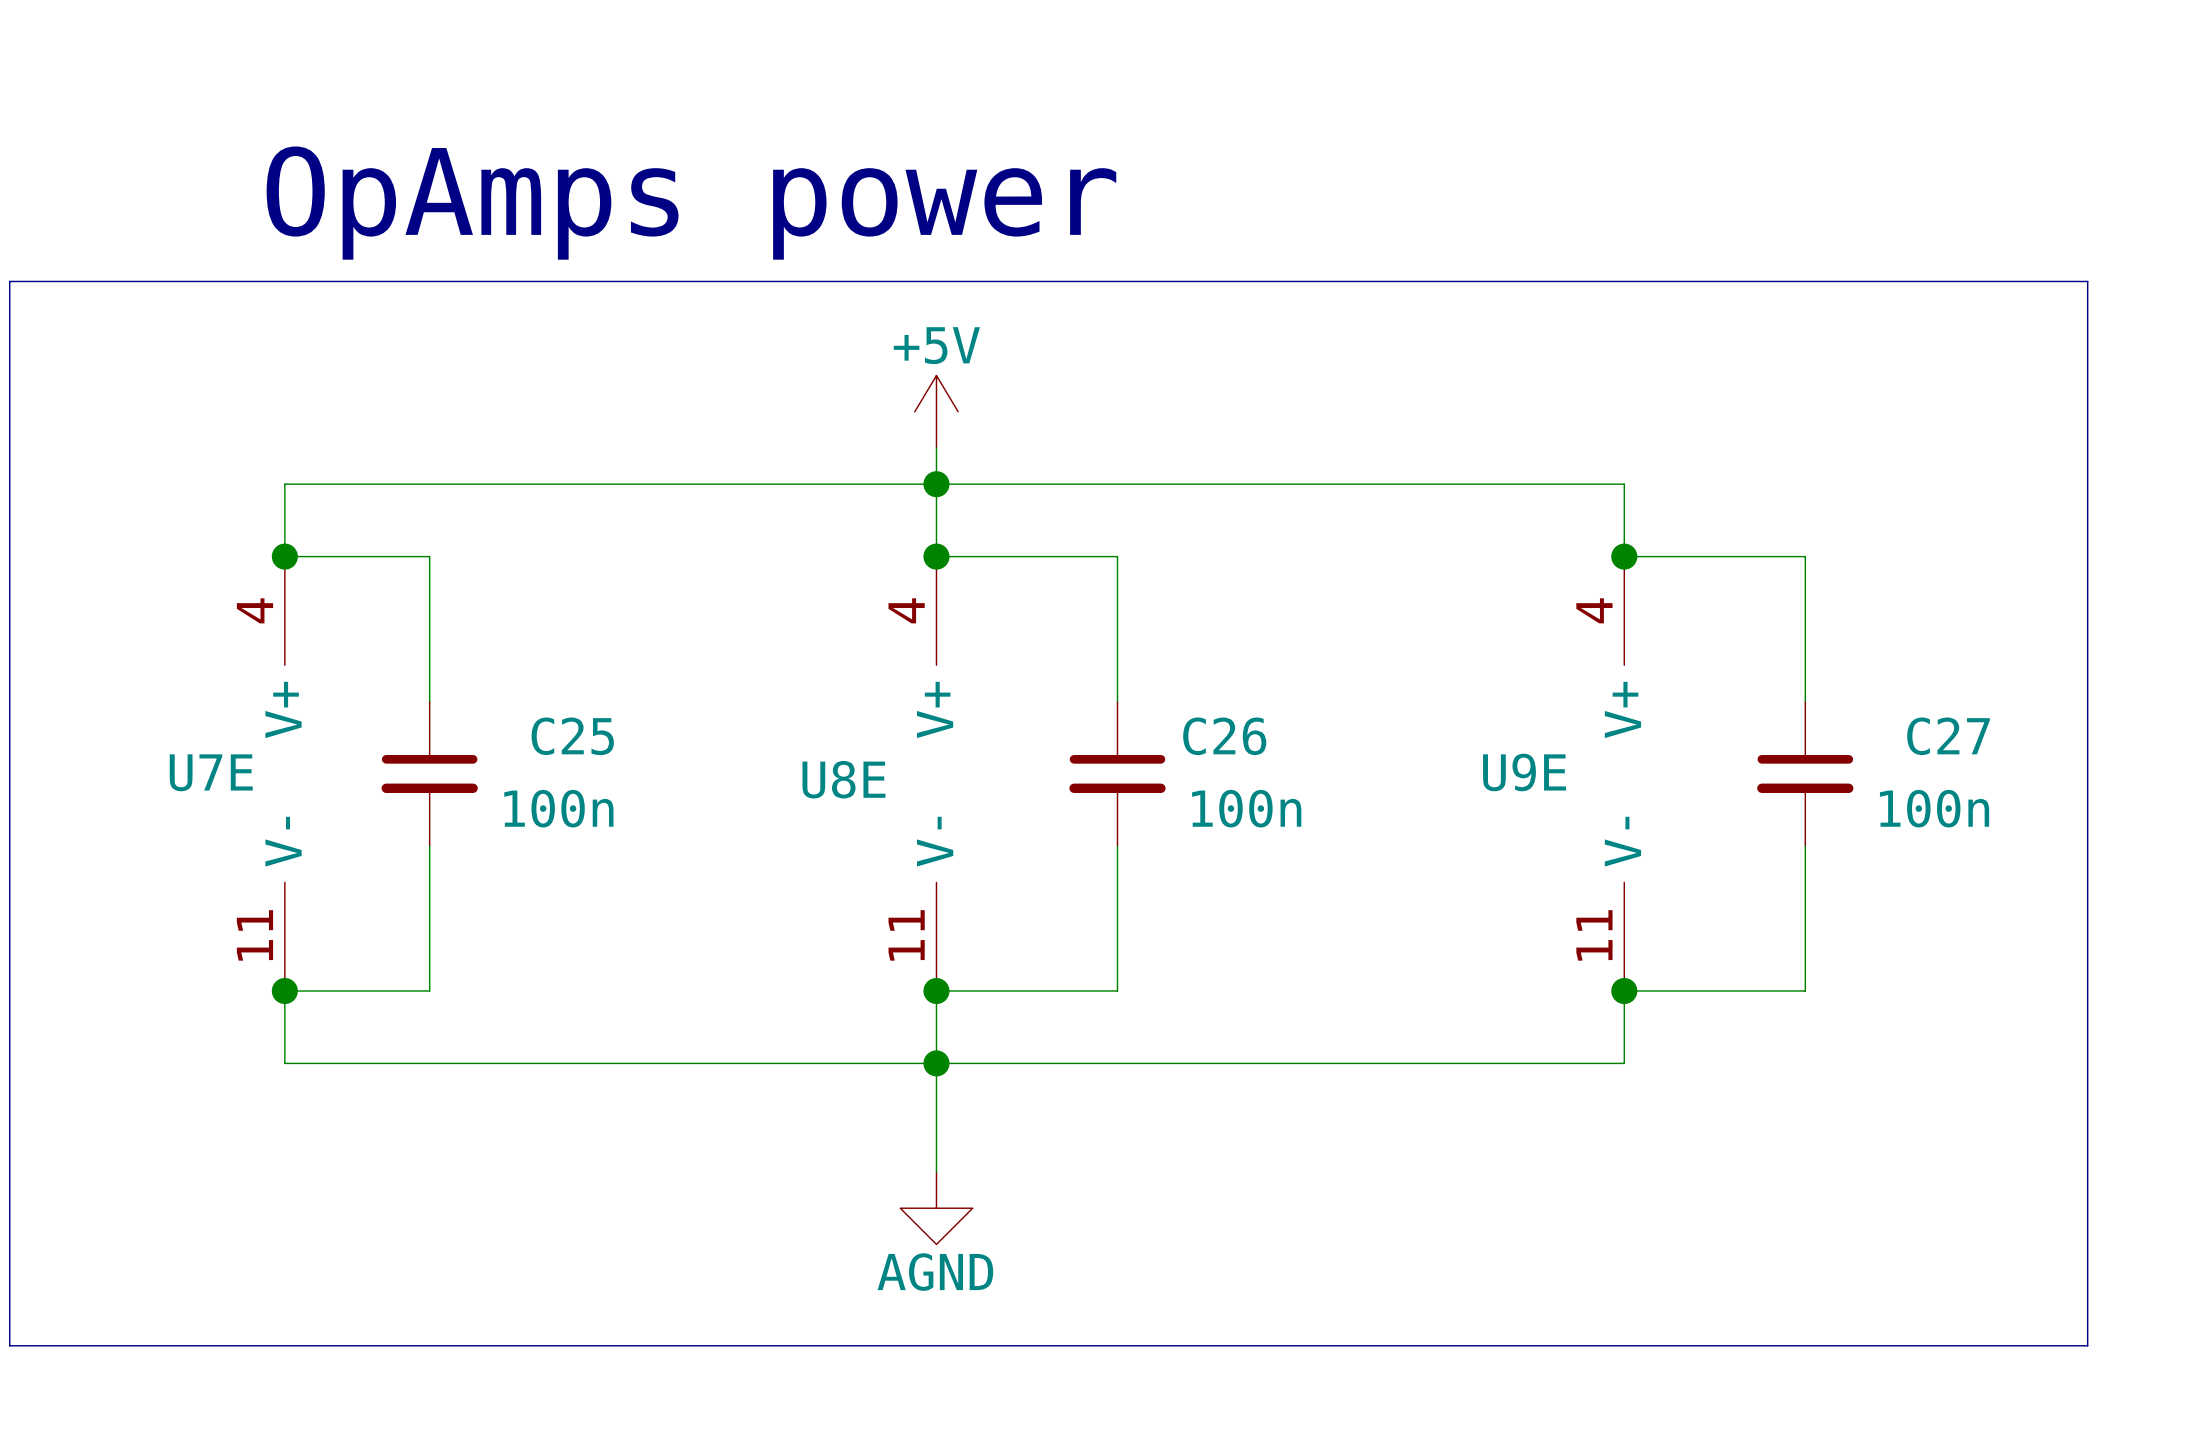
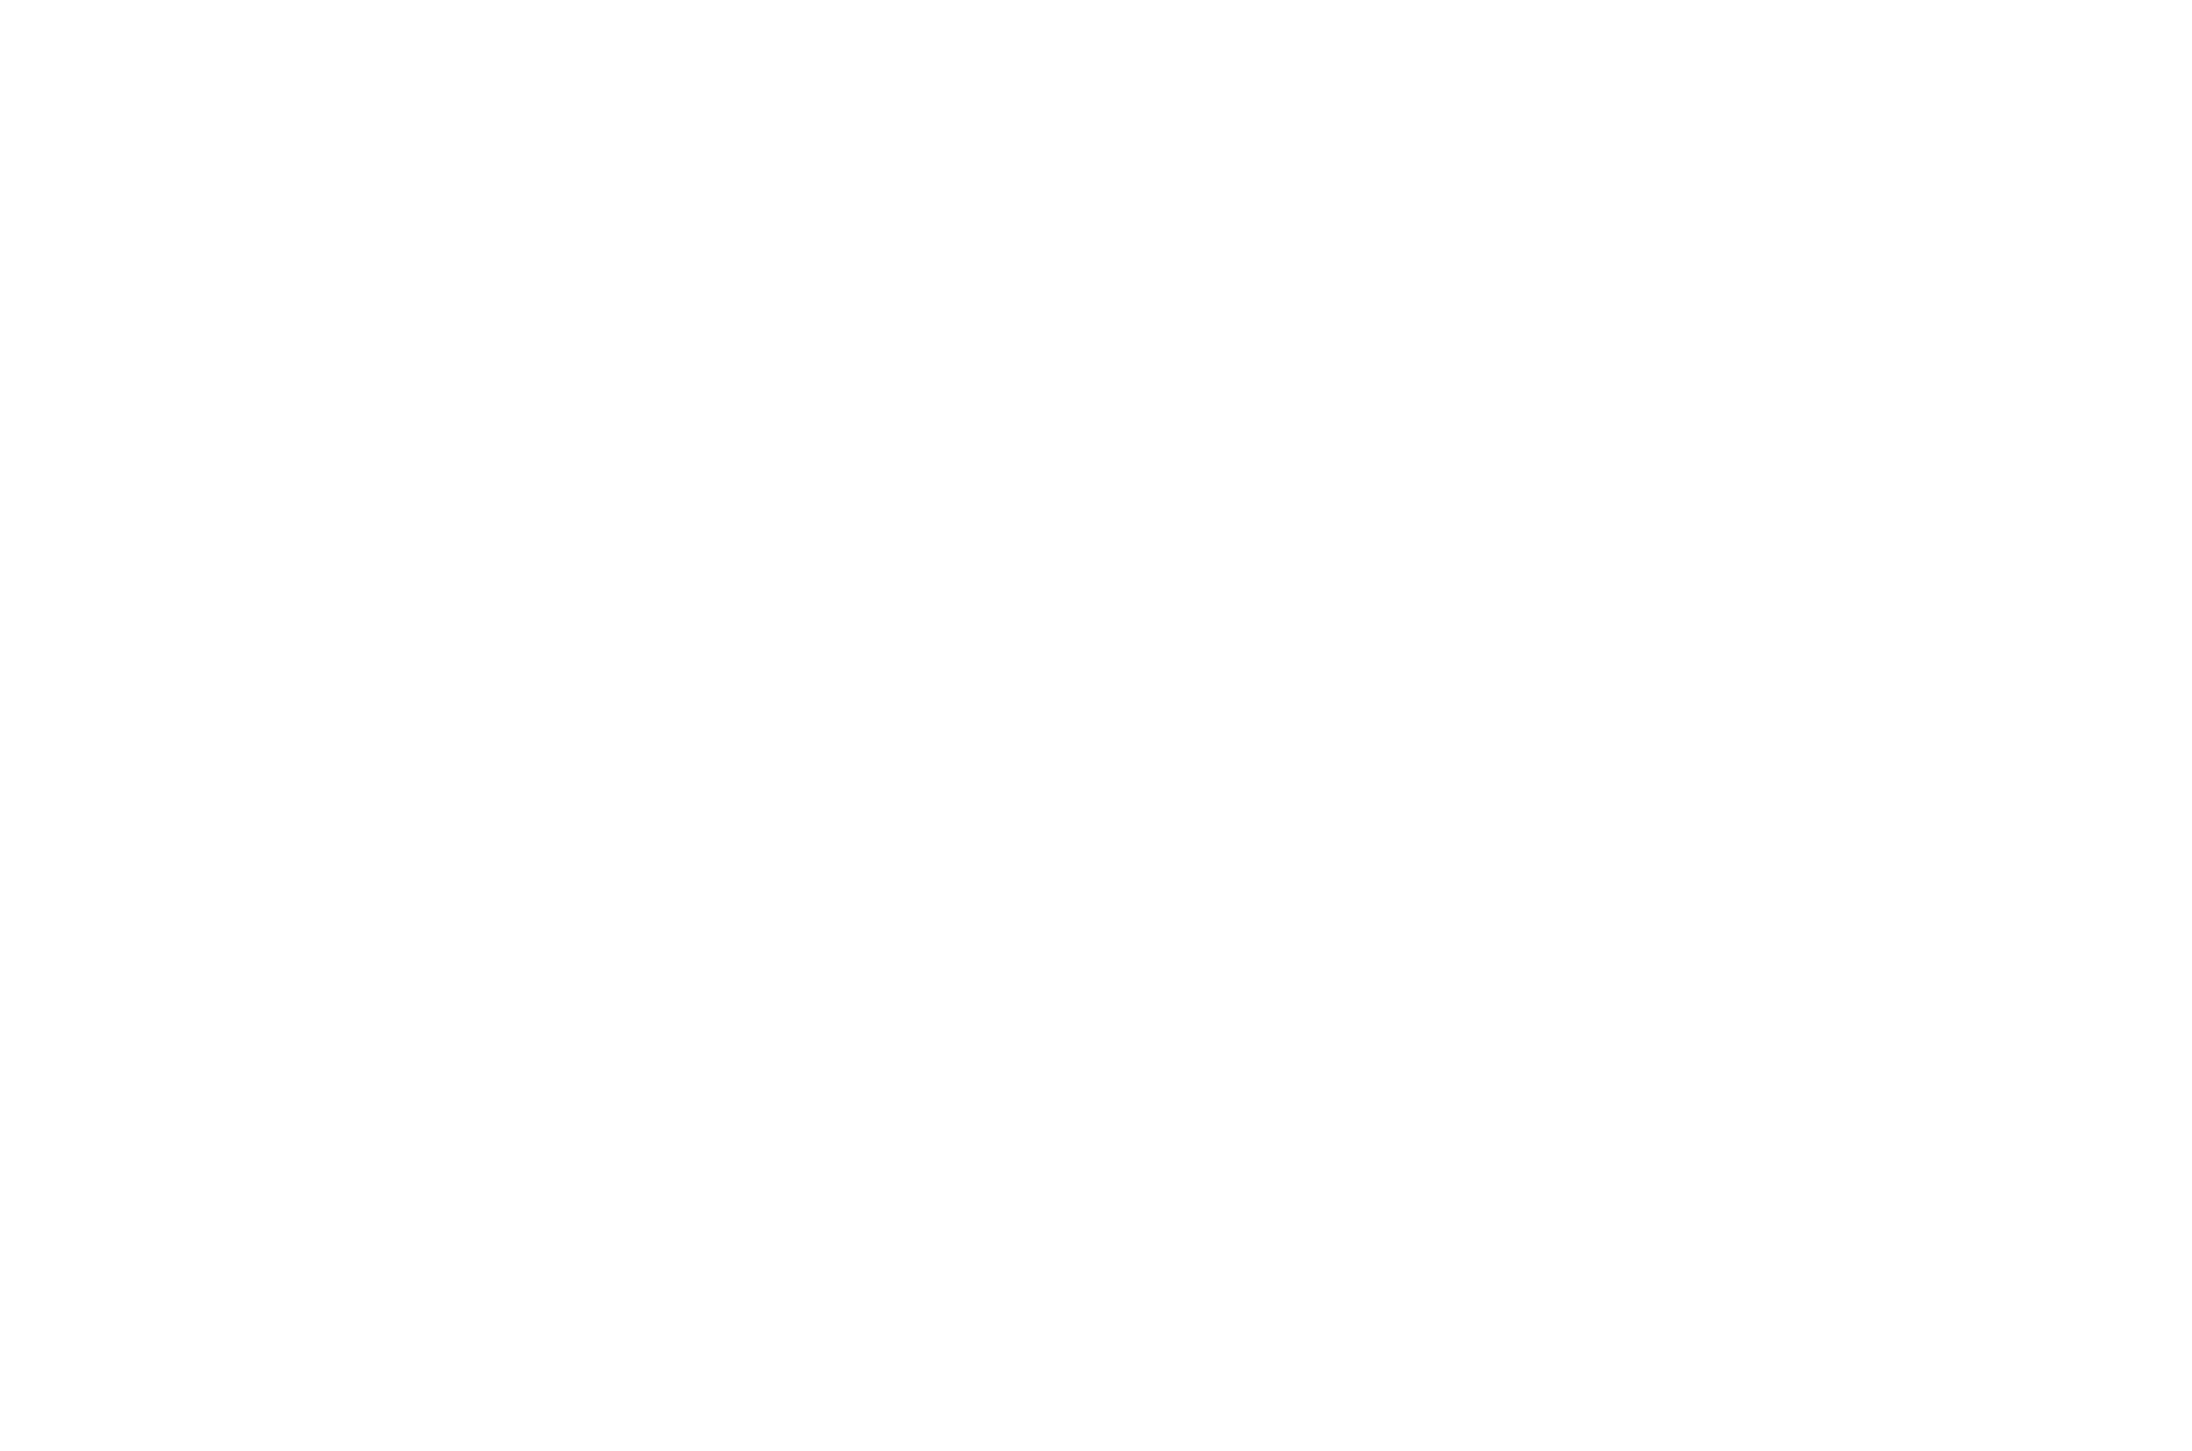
text: OpAmps power (691, 203) -> none
line: (9, 281) (2087, 281) (2087, 1345) (9, 1345) (9, 281) -> none
power symbol: +5V (936, 411) -> none
wire: (936, 447) (936, 556) (1117, 556) (1117, 701) -> none
junction: (936, 484) -> none
junction: (284, 556) -> none
junction: (936, 556) -> none
junction: (1624, 556) -> none
wire: (429, 701) (429, 556) (284, 556) (284, 484) (1624, 484) (1624, 556) (1805, 556) (1805, 701) -> none
U7E: (284, 773) -> none
C25: 100n (429, 773) -> none
U8E: (936, 773) -> none
C26: 100n (1117, 773) -> none
U9E: (1624, 773) -> none
C27: 100n (1805, 773) -> none
wire: (429, 846) (429, 991) (284, 991) (284, 1063) (1624, 1063) (1624, 991) (1805, 991) (1805, 846) -> none
wire: (1117, 846) (1117, 991) (936, 991) (936, 1172) -> none
junction: (284, 991) -> none
junction: (936, 991) -> none
junction: (1624, 991) -> none
junction: (936, 1063) -> none
power symbol: AGND (936, 1208) -> none

